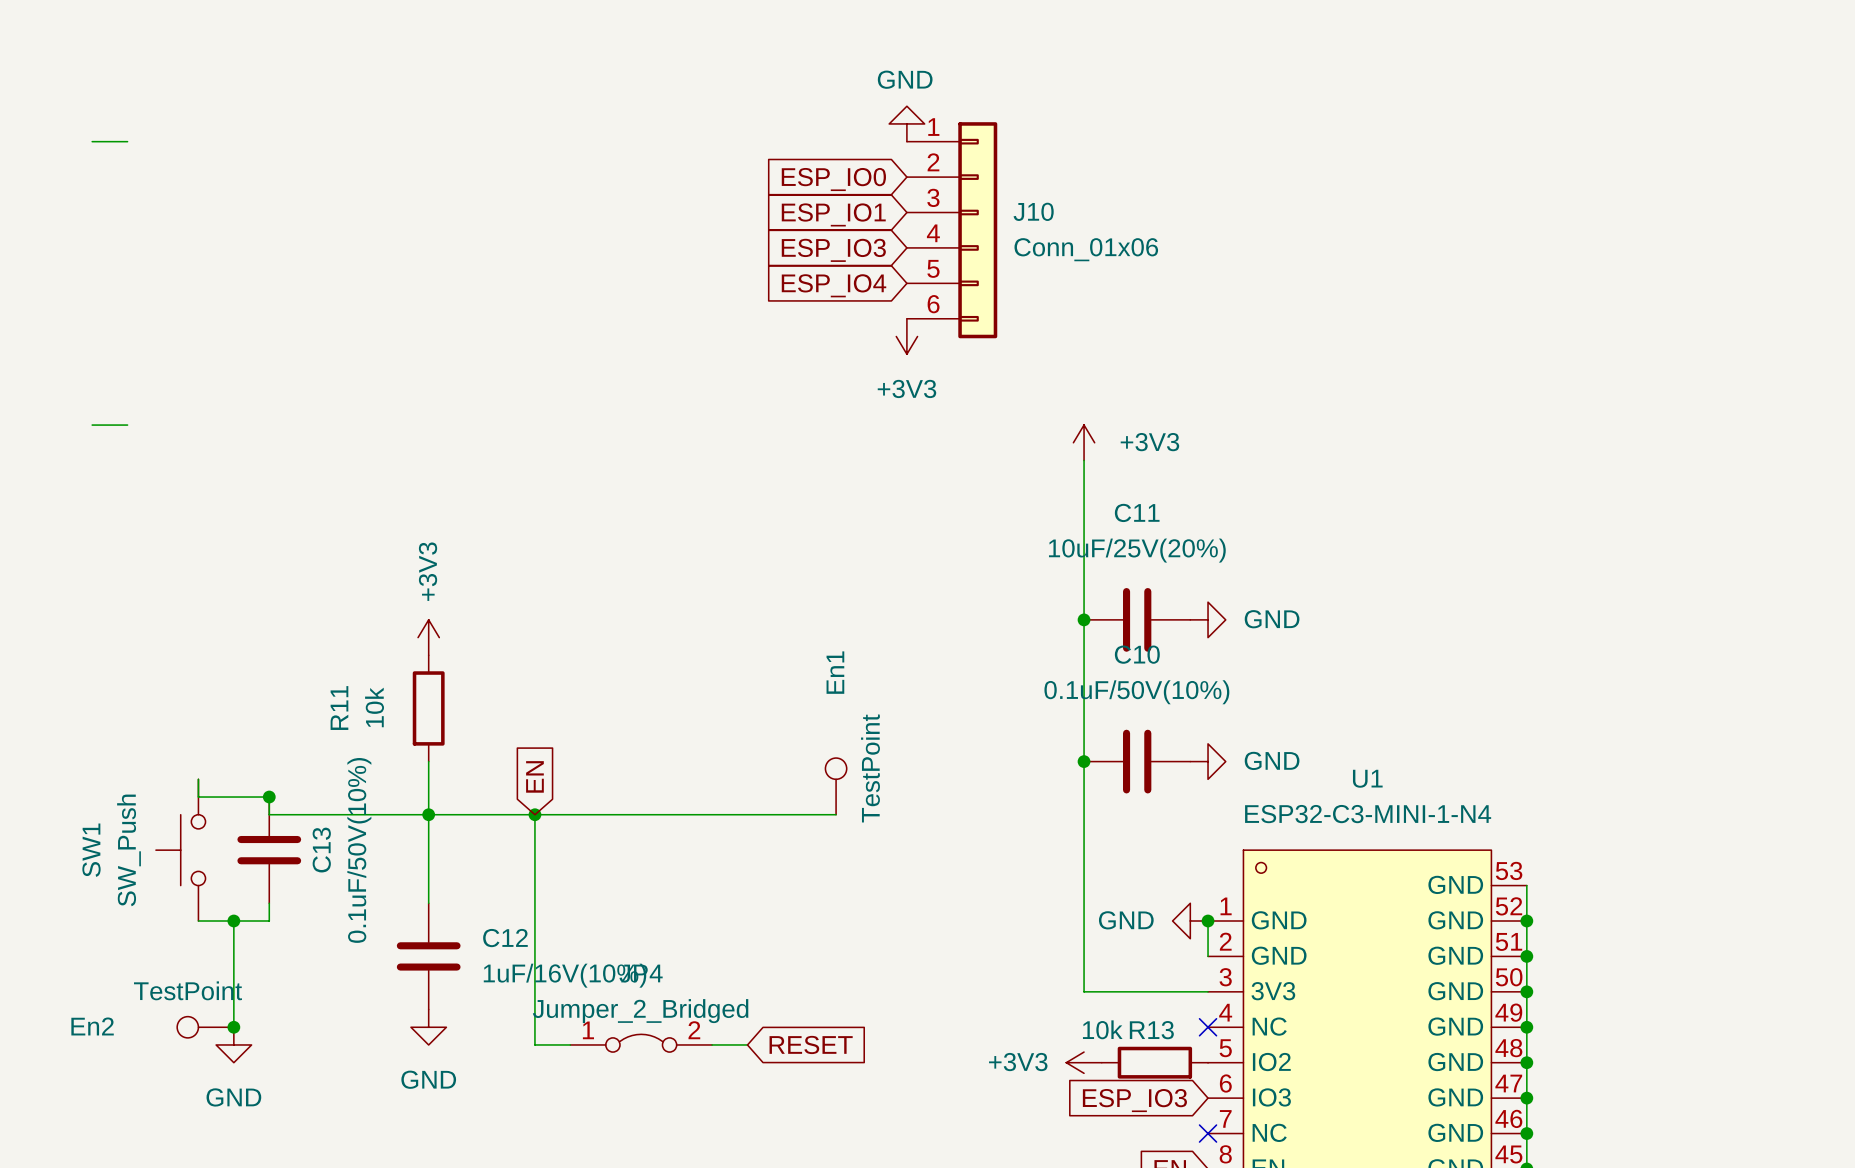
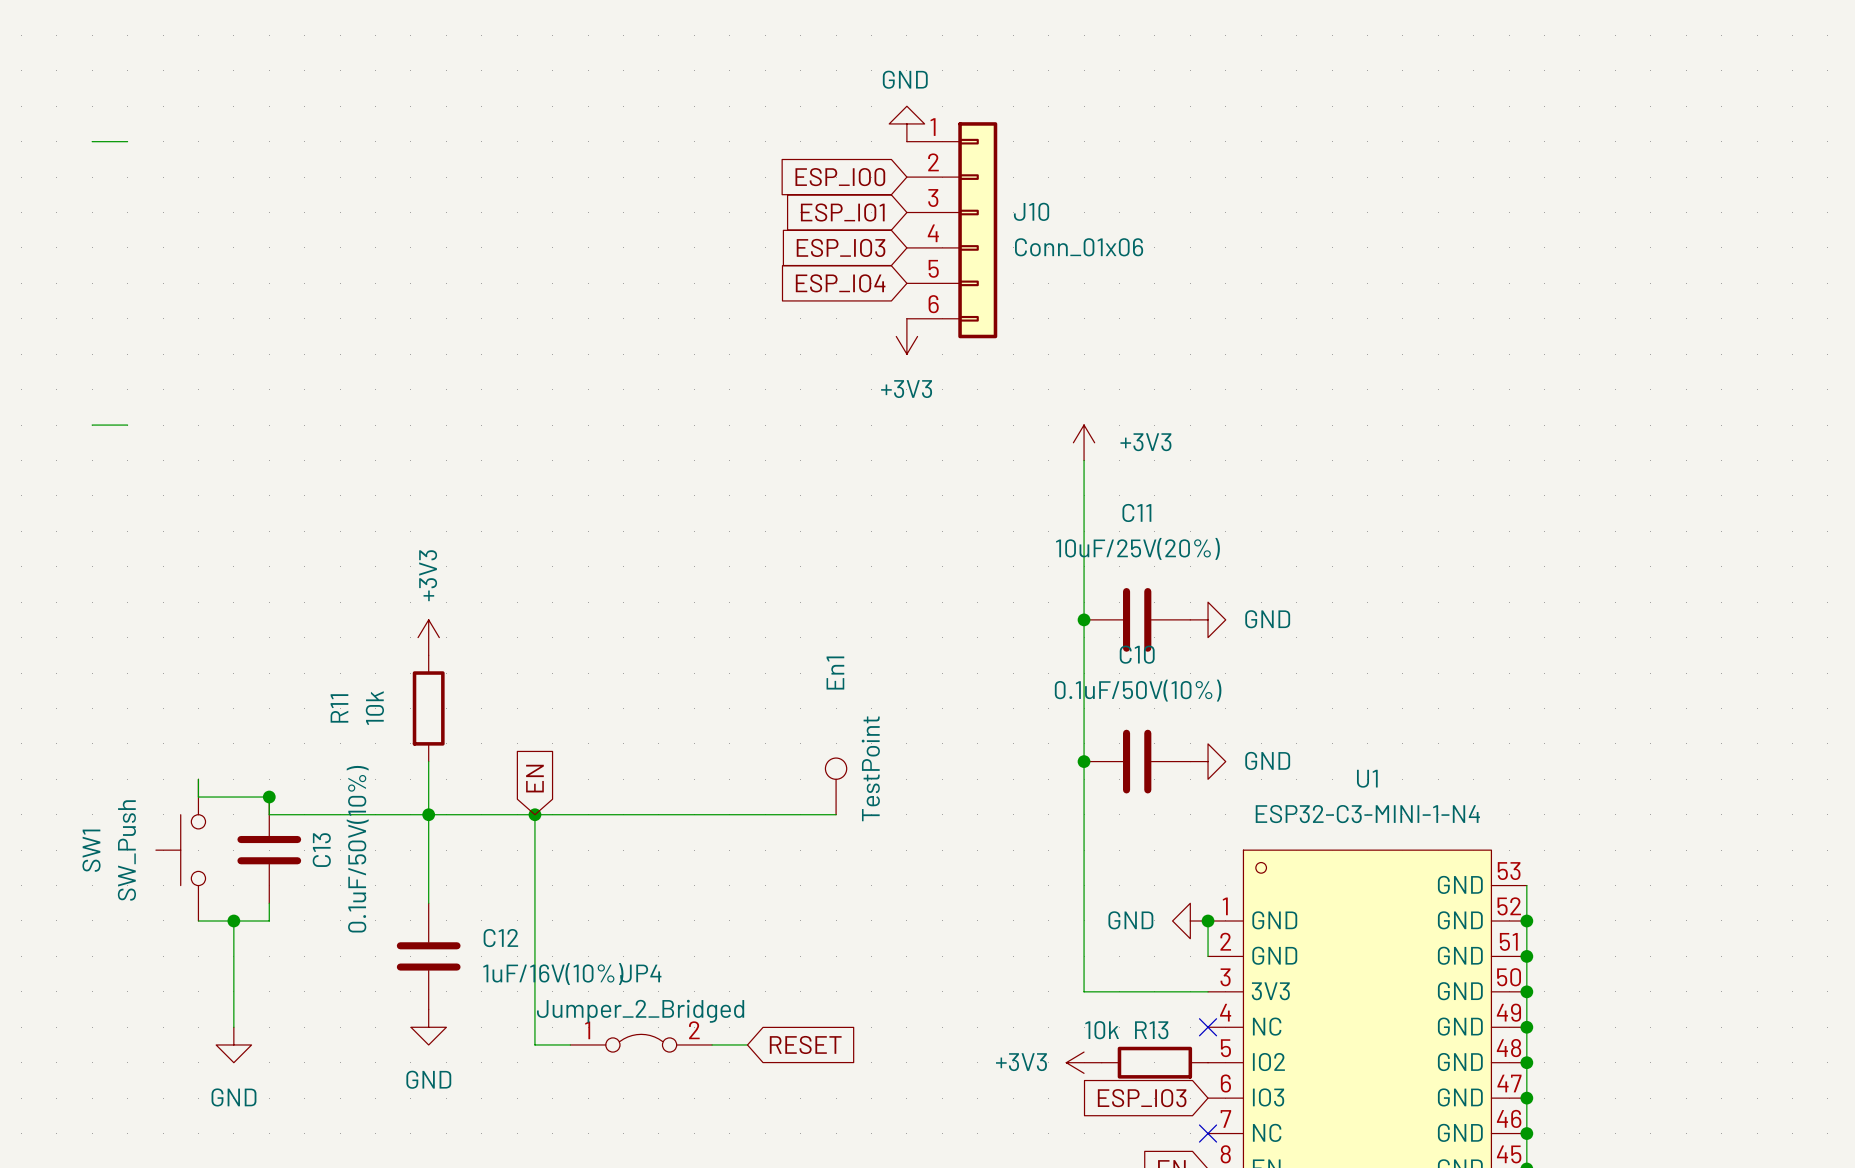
En2: TestPoint (205, 1027) -> none
junction: (233, 1027) -> none

